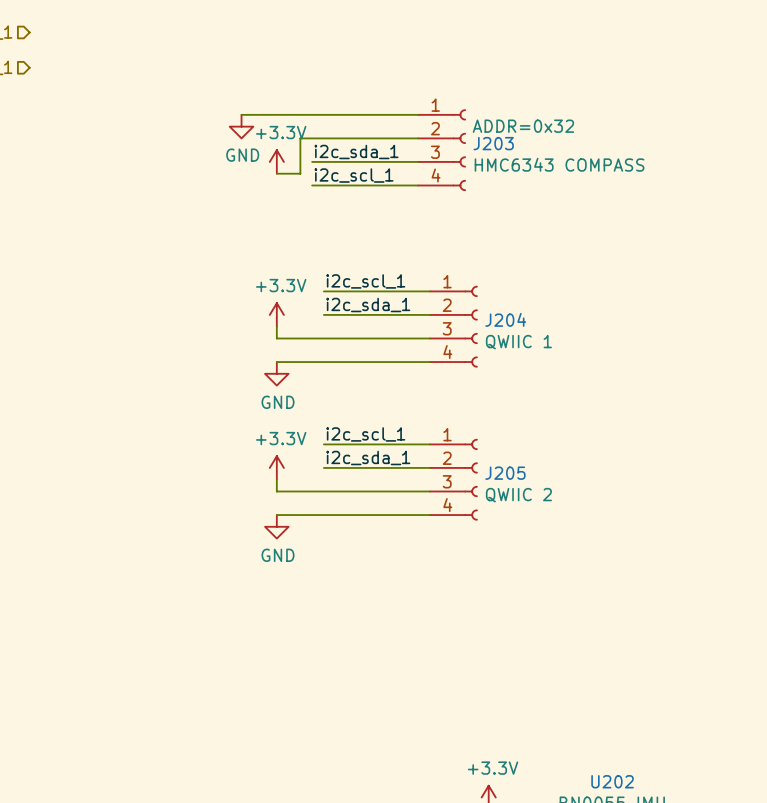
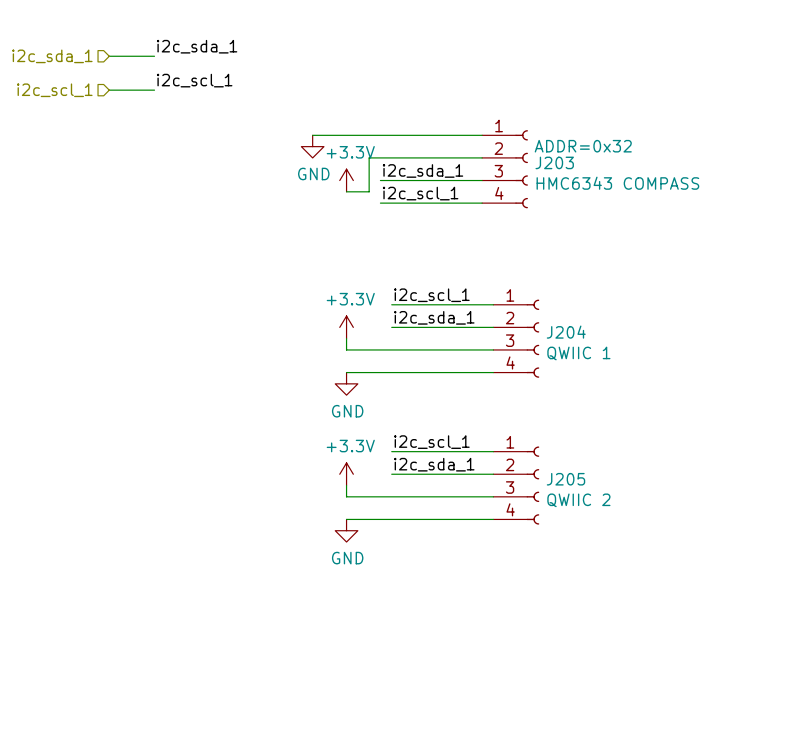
label: none -> i2c_sda_1 (197, 46)
wire: none -> (109, 56) (154, 56)
label: none -> i2c_scl_1 (194, 80)
wire: none -> (109, 90) (154, 90)

